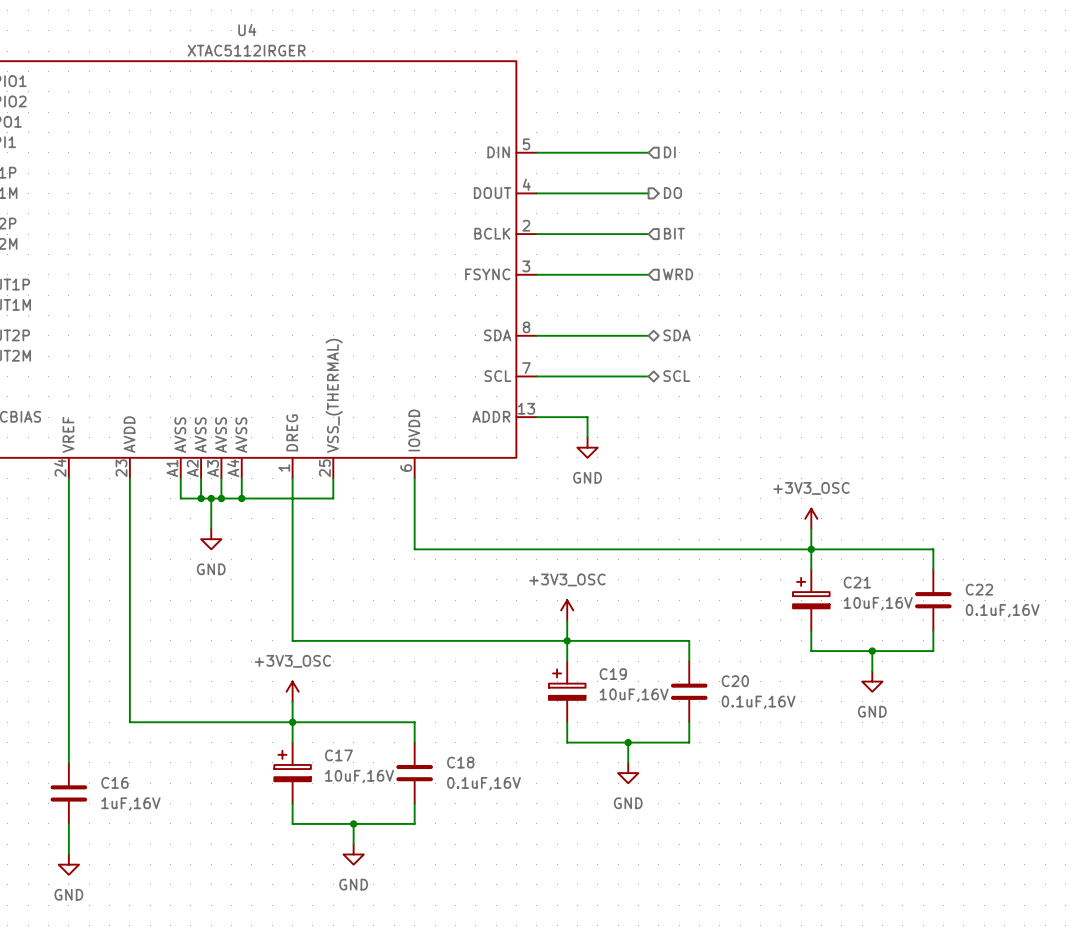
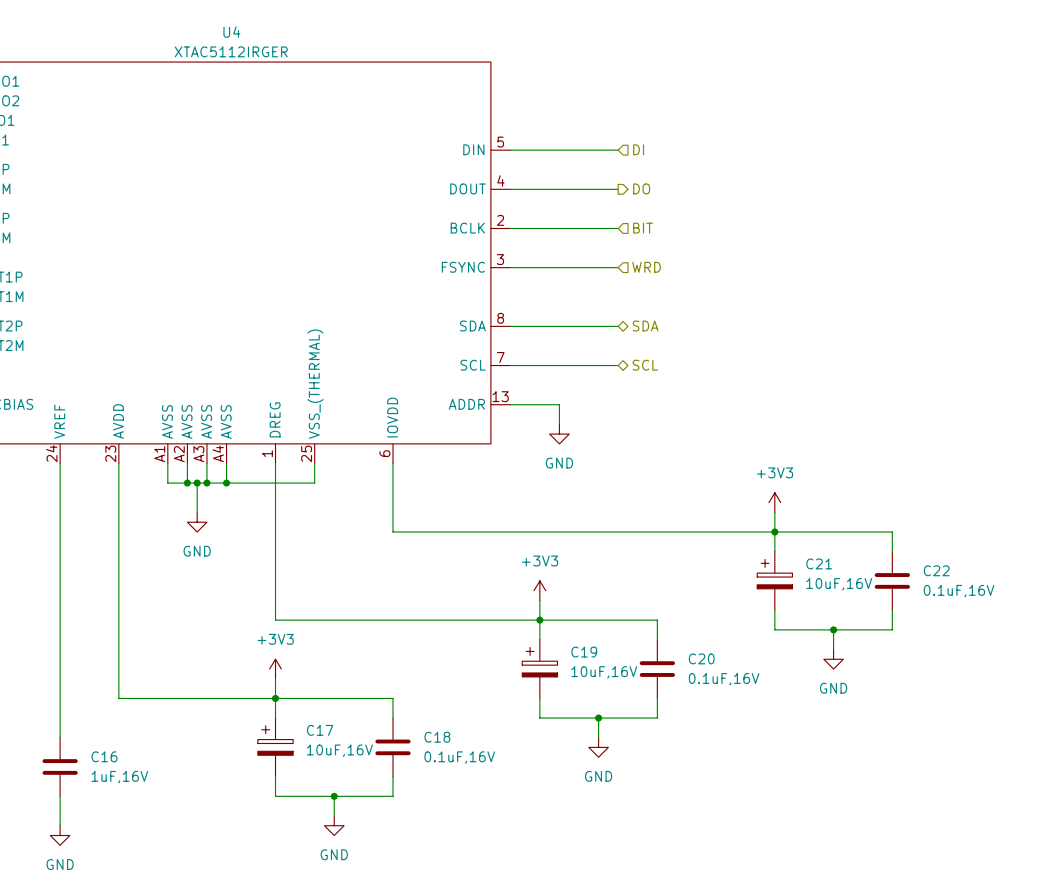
power symbol: +3V3_OSC (811, 518) -> +3V3 (774, 502)
power symbol: +3V3_OSC (567, 610) -> +3V3 (539, 590)
power symbol: +3V3_OSC (292, 691) -> +3V3 (275, 669)

